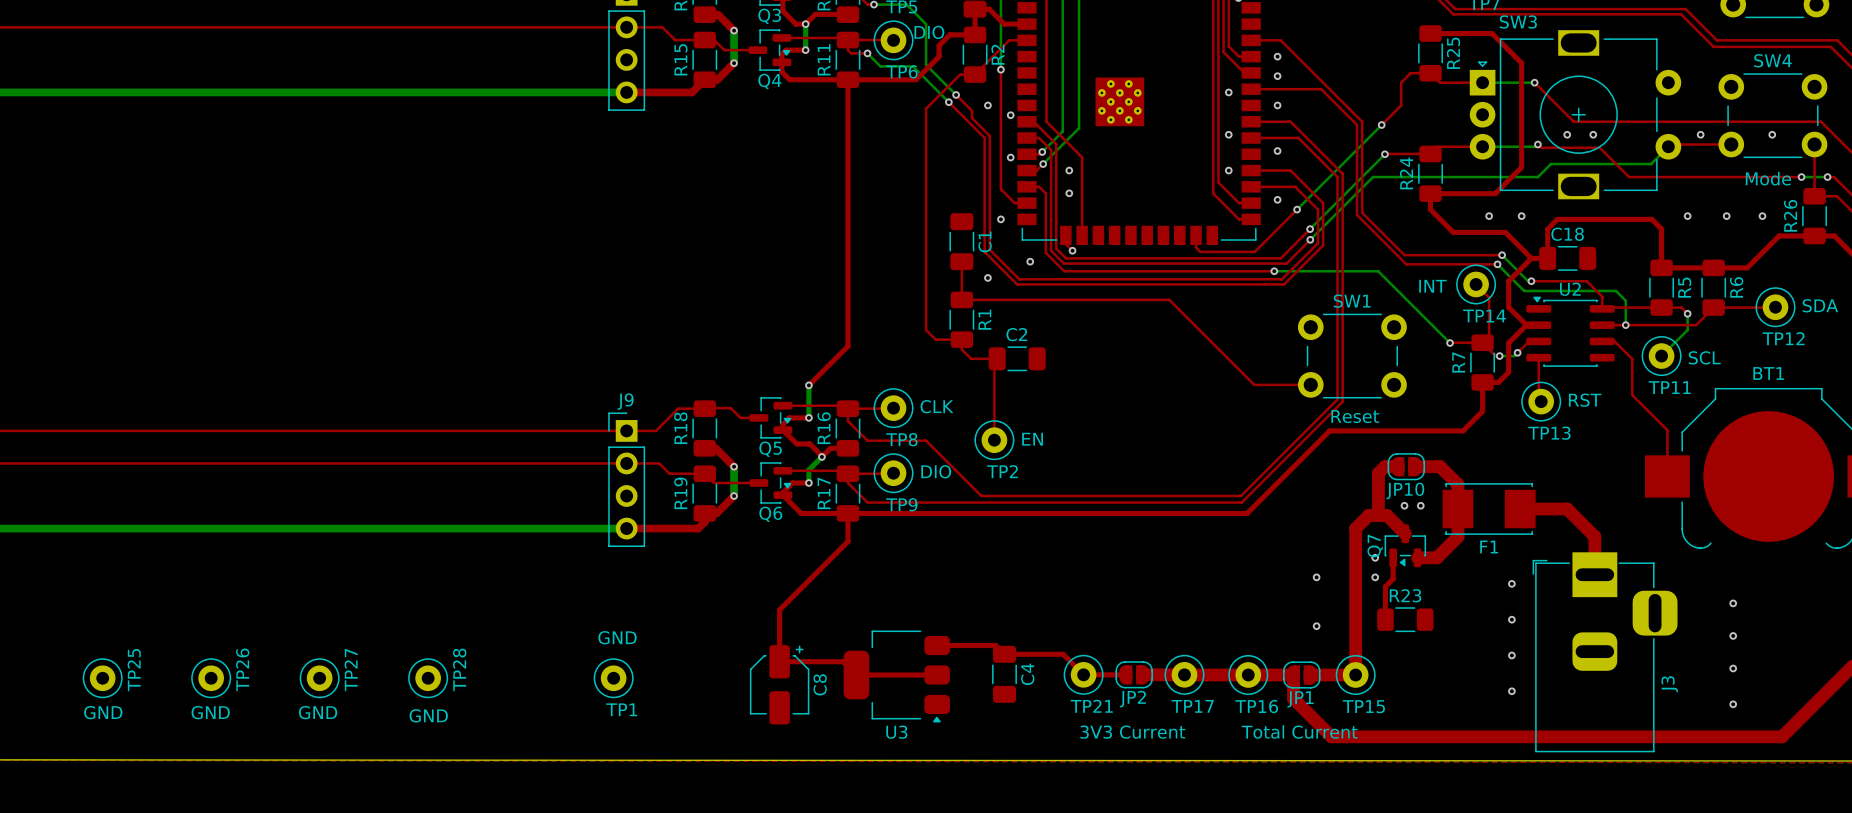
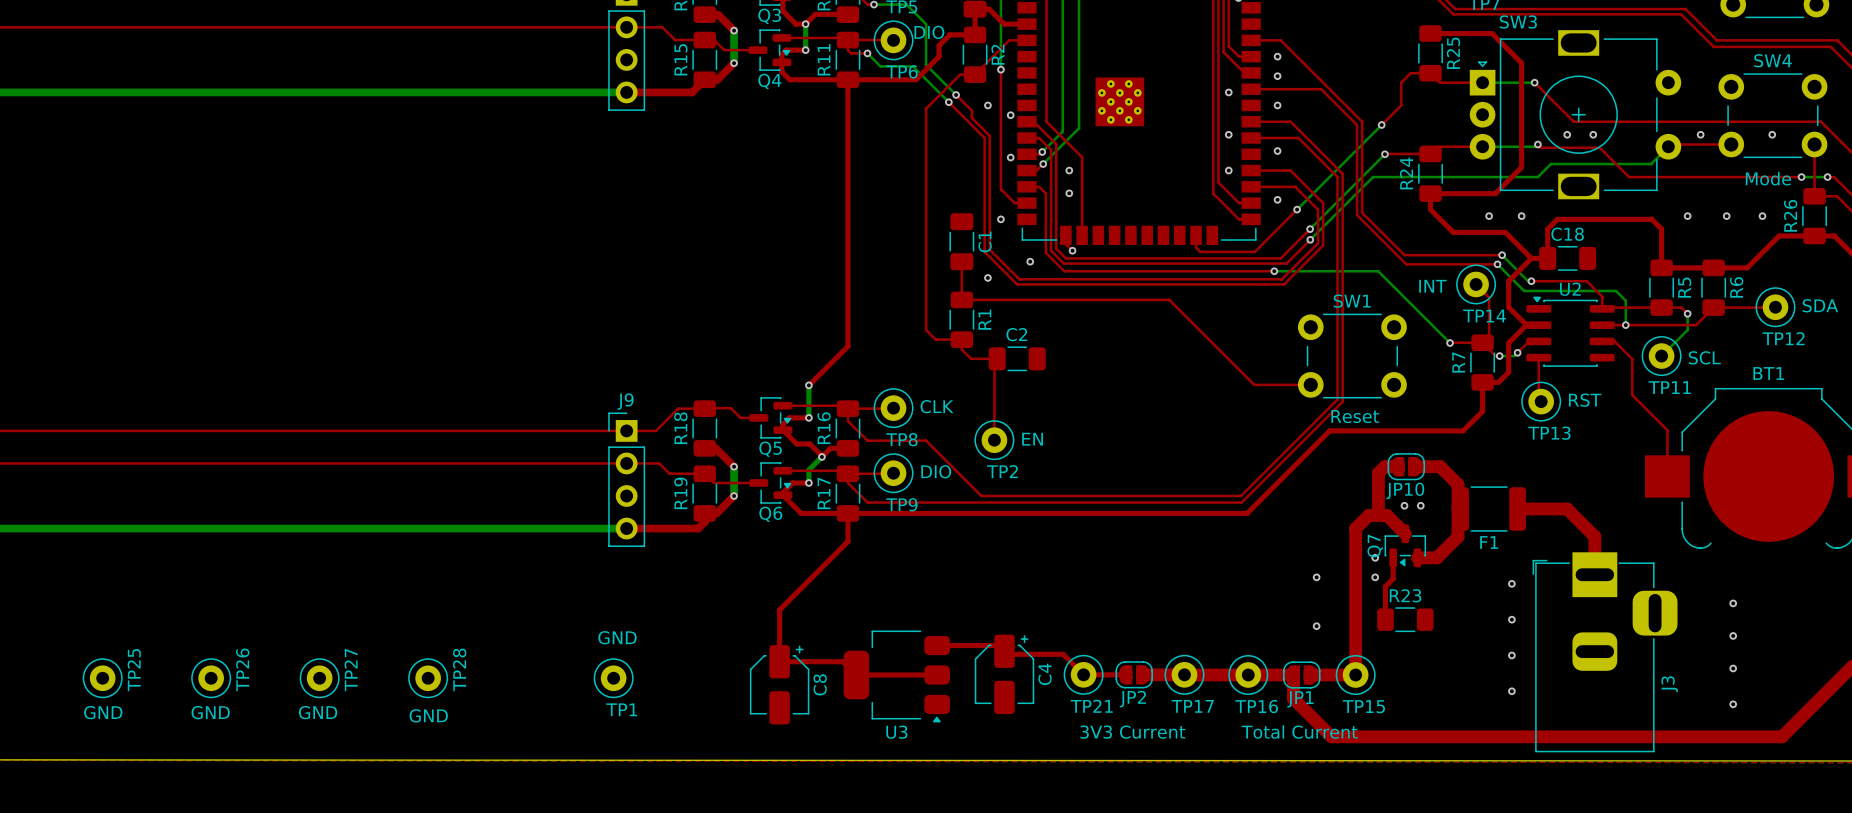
F1 footprint: [1442, 483, 1536, 535] -> [1452, 486, 1526, 532]
C4 footprint: [992, 645, 1017, 703] -> [974, 634, 1035, 715]

